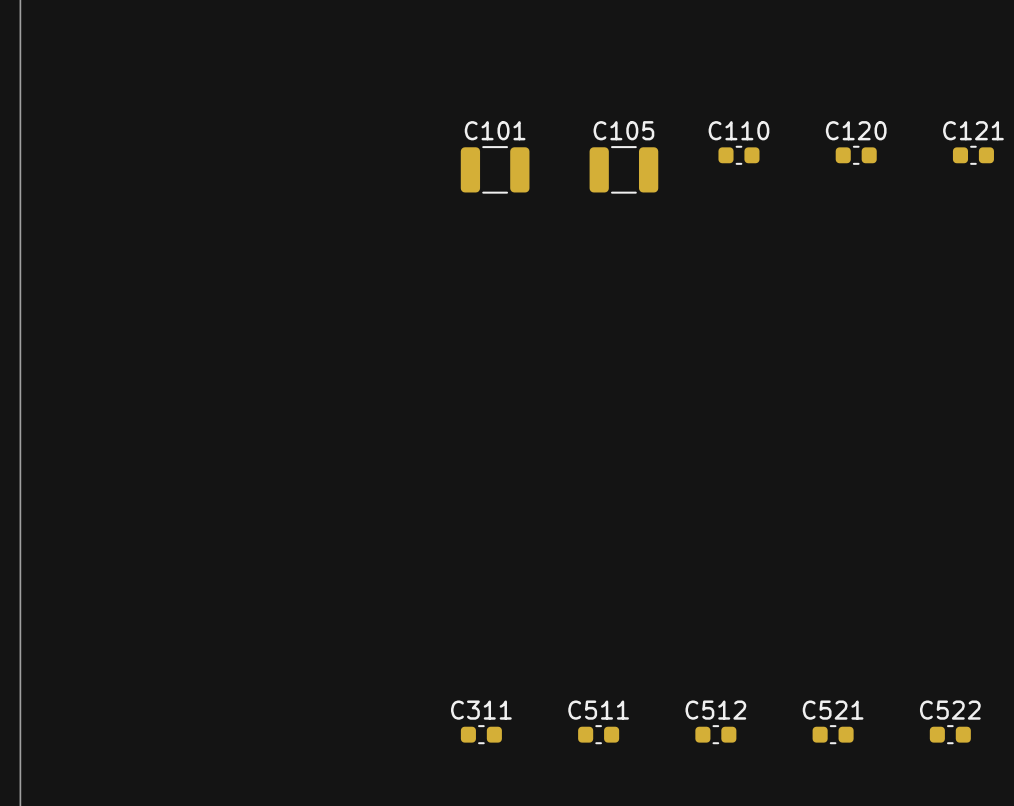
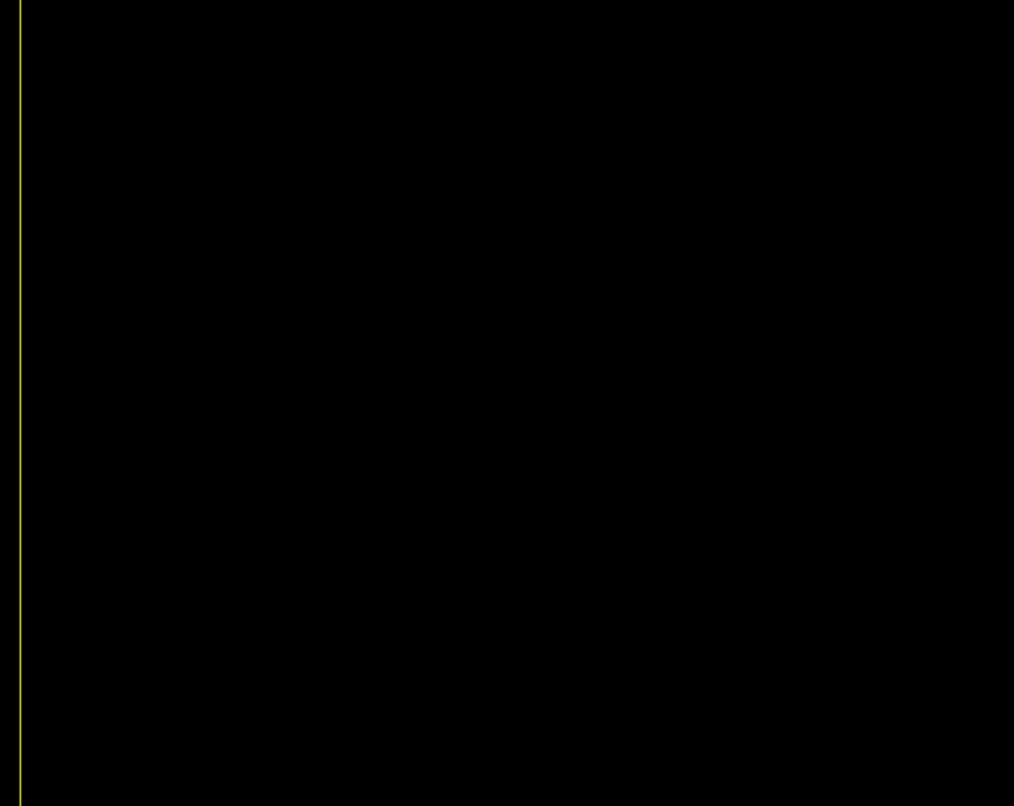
C110: (738, 155) -> none
C120: (856, 155) -> none
C121: (973, 155) -> none
C101: (495, 169) -> none
C105: (623, 169) -> none
C311: (481, 734) -> none
C511: (598, 734) -> none
C512: (715, 734) -> none
C521: (833, 734) -> none
C522: (950, 734) -> none

